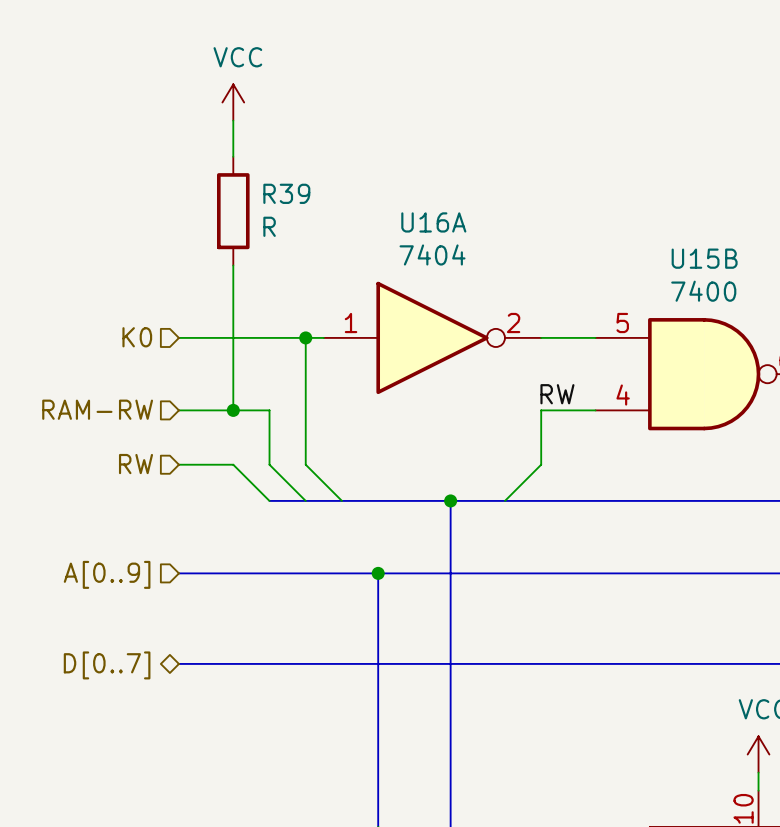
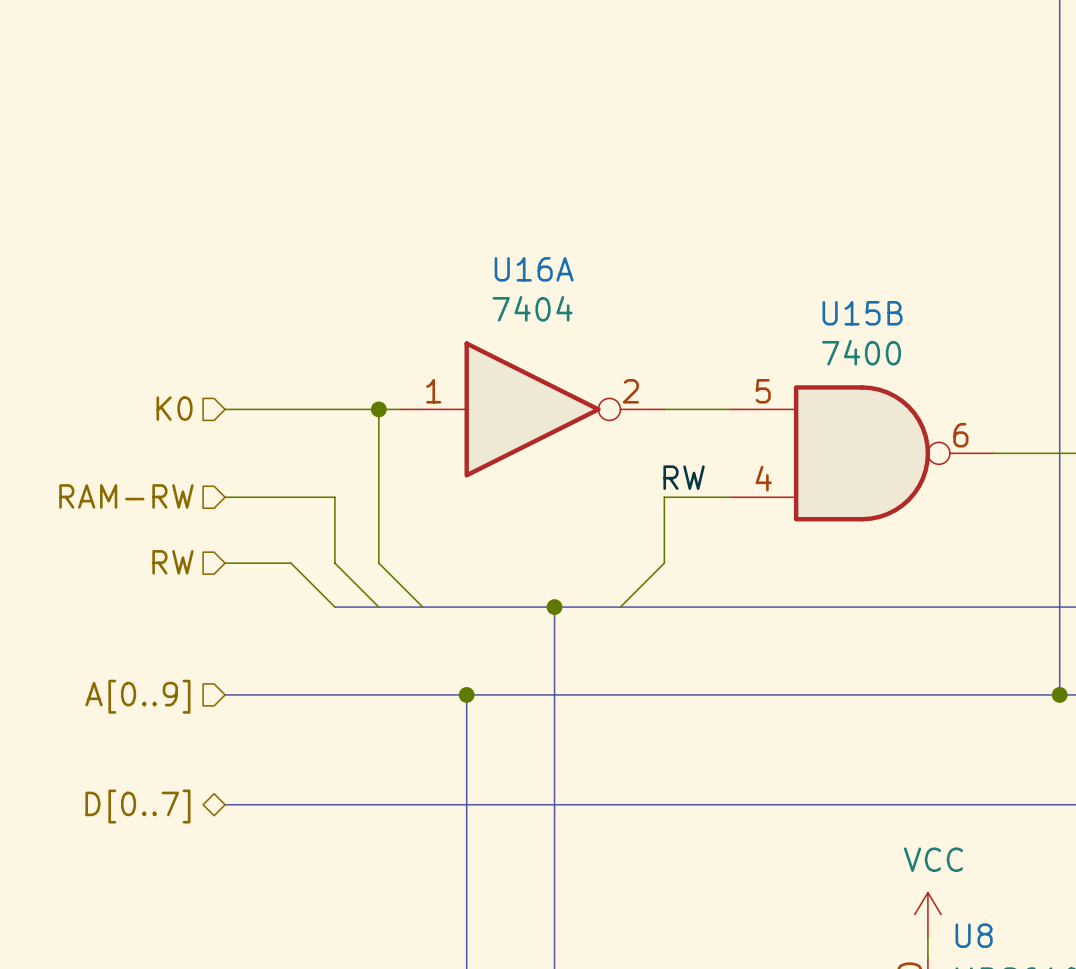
power symbol: VCC (233, 102) -> none
wire: (233, 120) (233, 156) -> none
R39: R (233, 211) -> none
wire: (233, 265) (233, 410) -> none
junction: (233, 410) -> none

